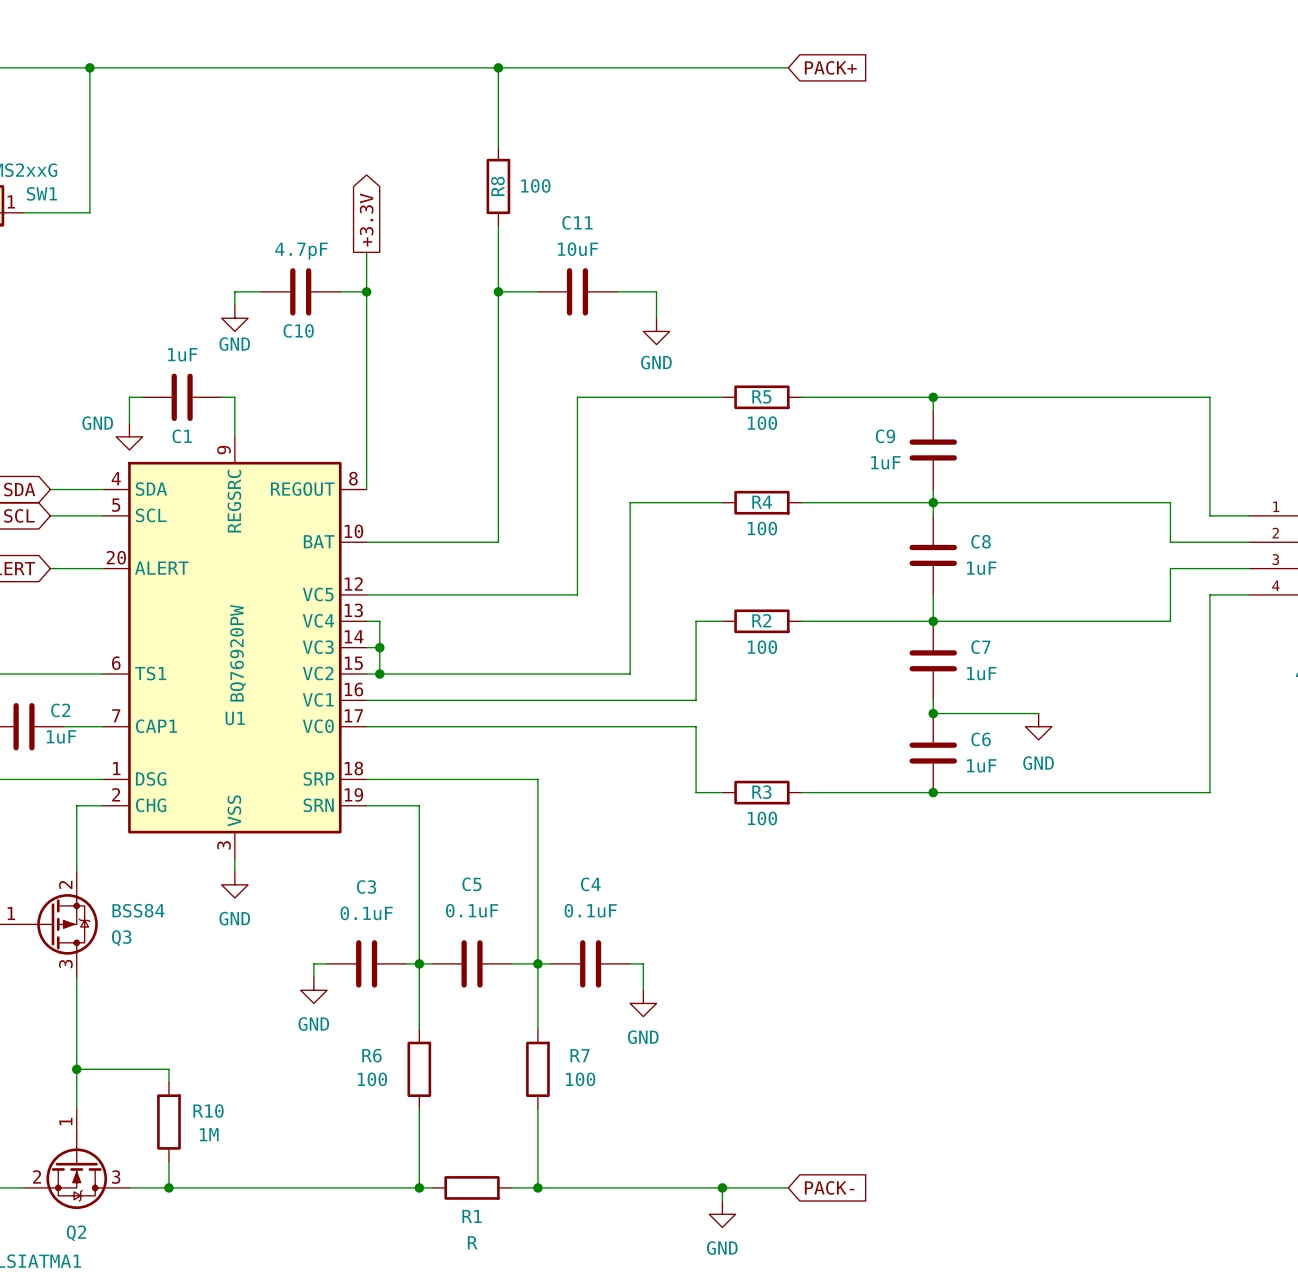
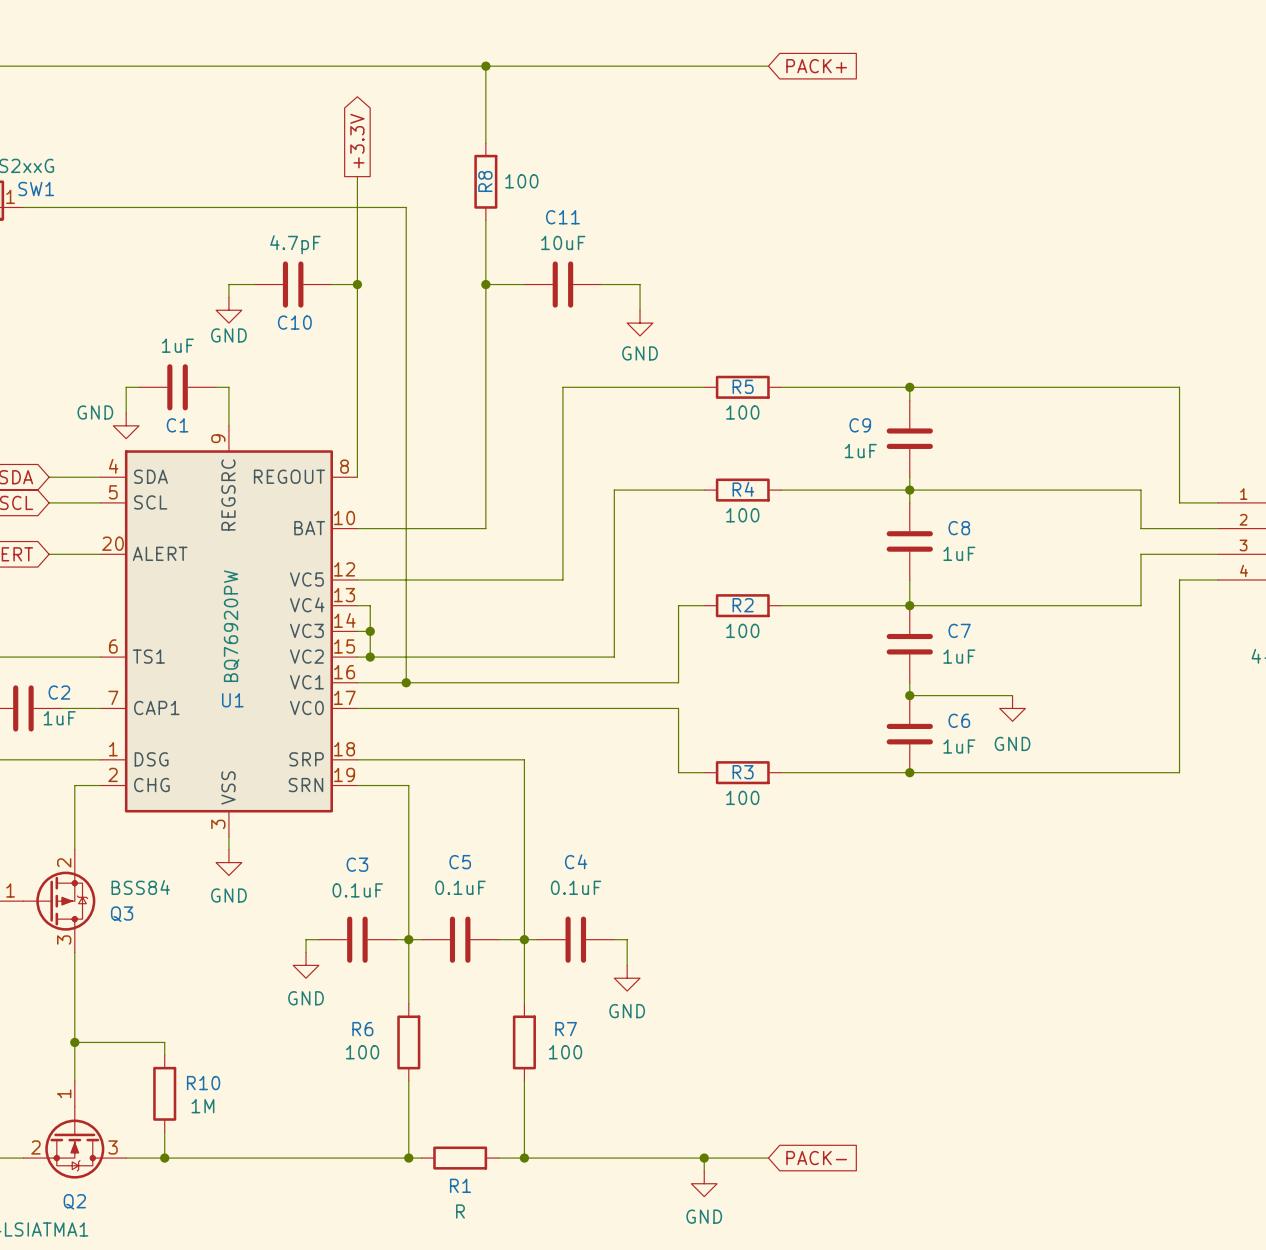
wire: (89, 67) (89, 212) -> (406, 682) (406, 207) (87, 207)
junction: (89, 67) -> none
wire: none -> (357, 176) (357, 246)
global label position: +3.3V (366, 220) -> +3.3V (357, 141)
junction: none -> (406, 682)

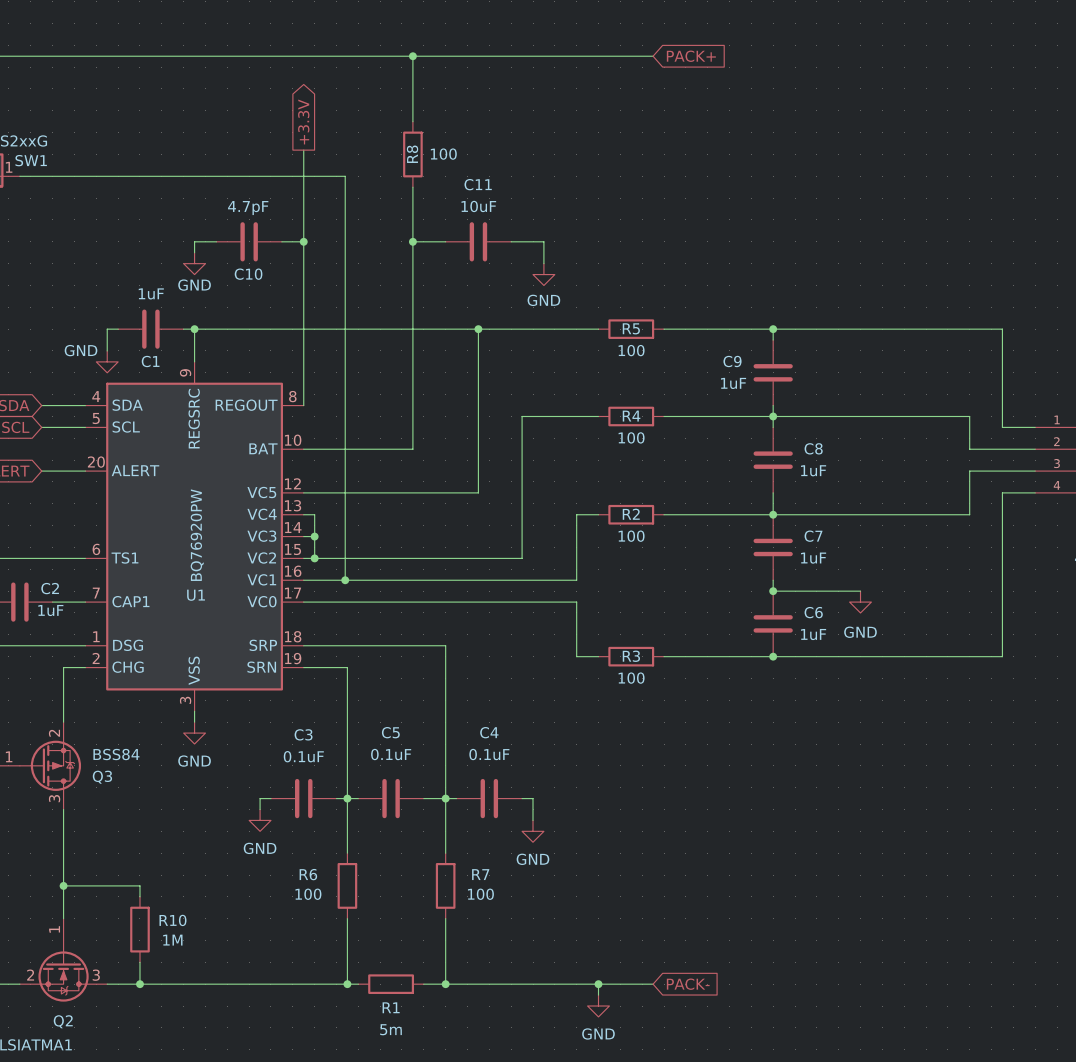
wire: none -> (194, 329) (478, 329)
junction: none -> (194, 329)
junction: none -> (478, 329)
R1 value: R (460, 1211) -> 5m (391, 1029)

